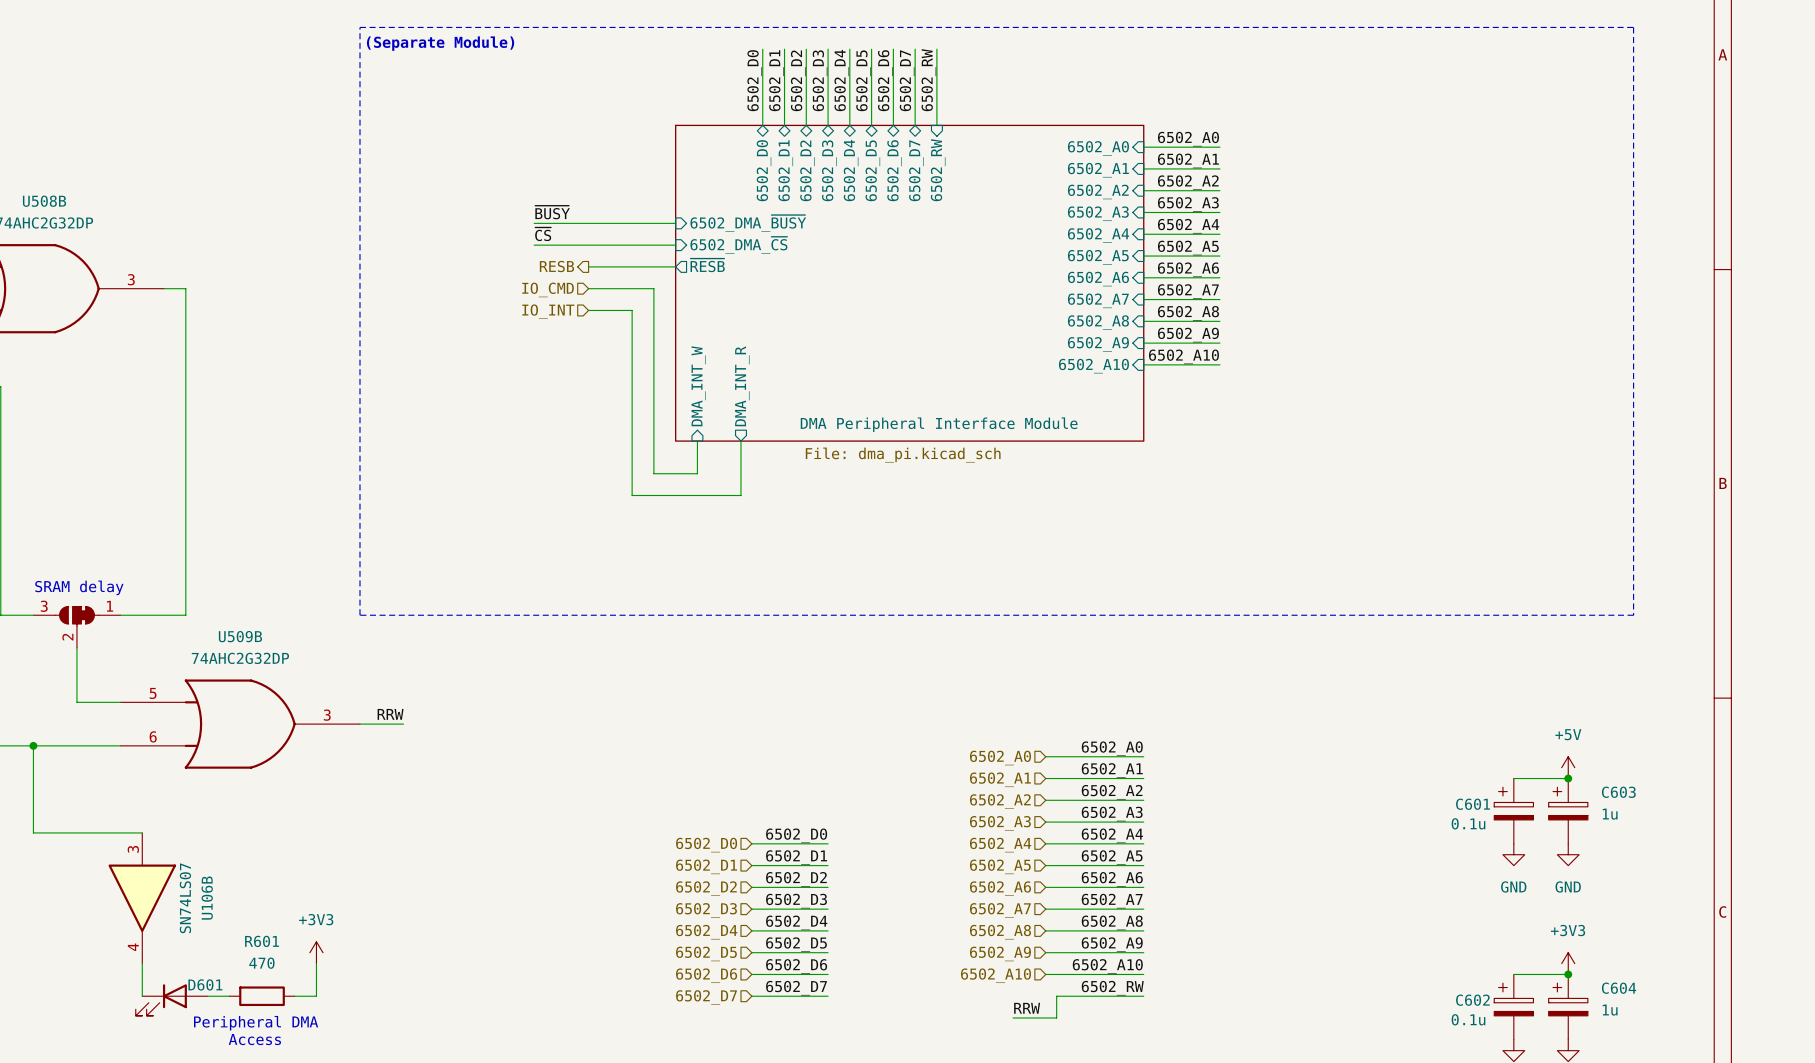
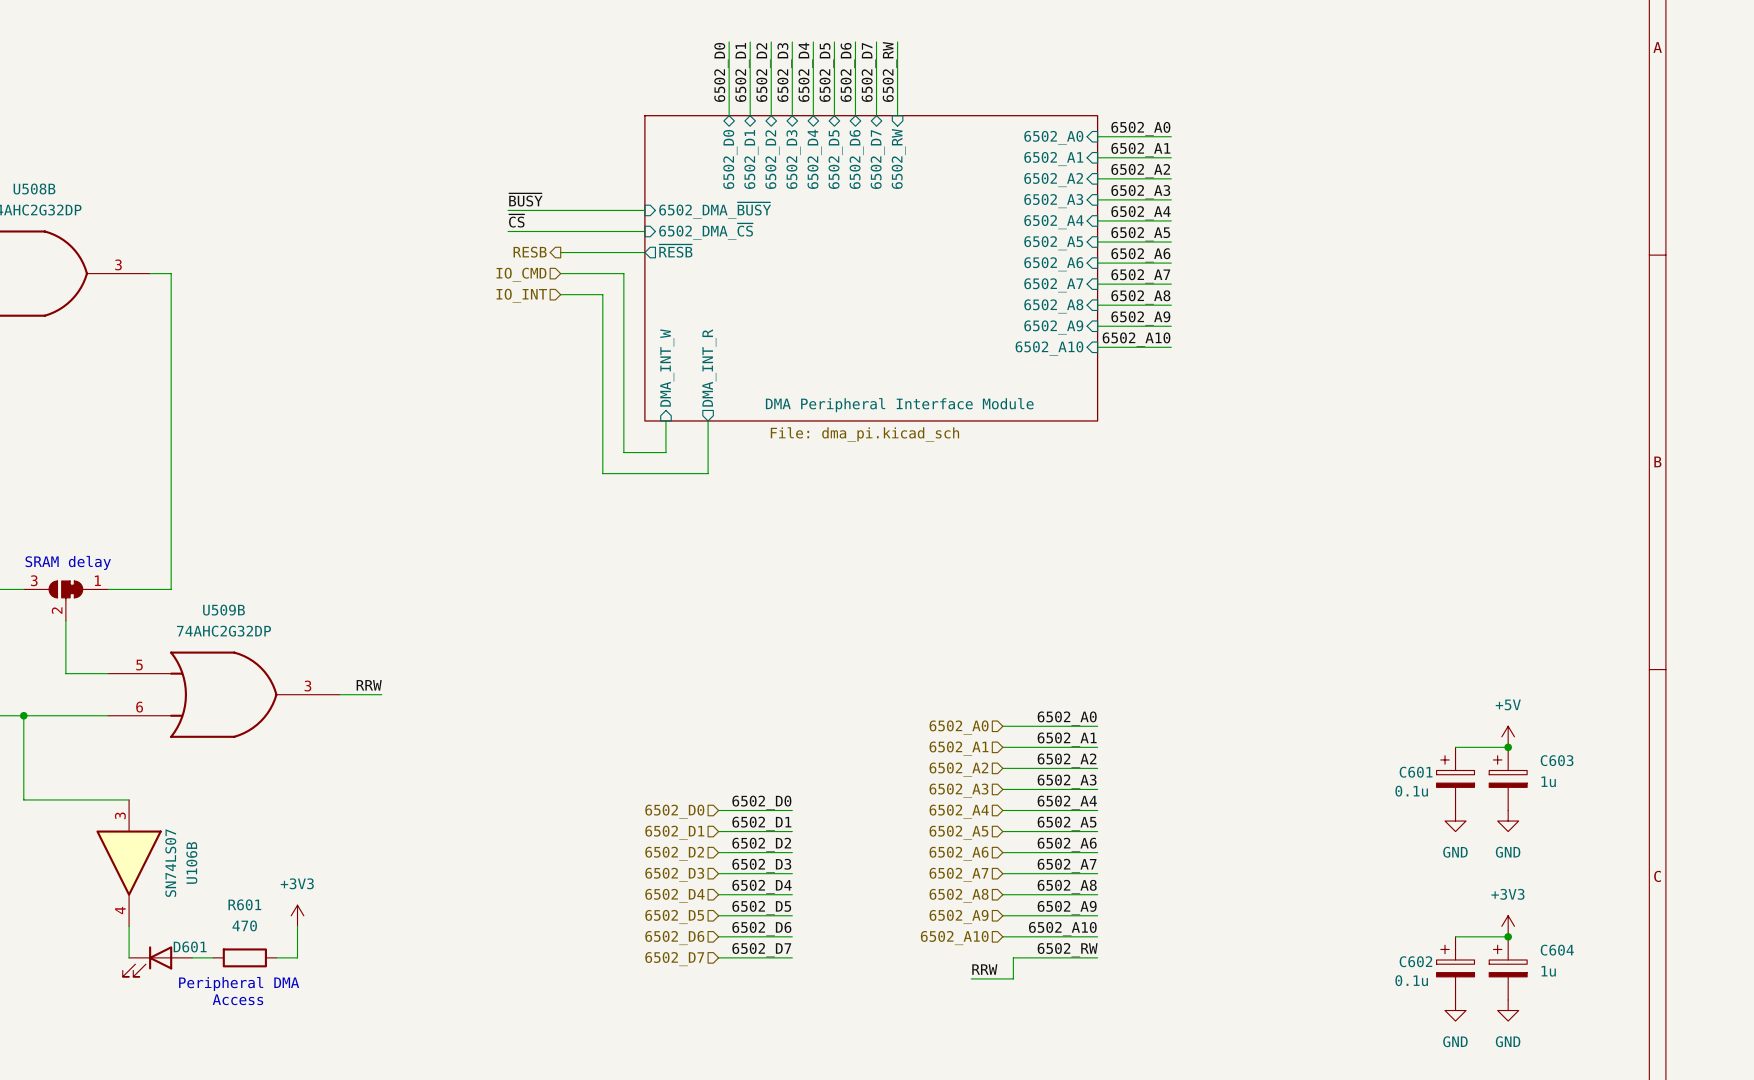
line: (359, 27) (1633, 27) (1633, 615) (359, 615) (359, 27) -> none
text: (Separate Module) (440, 43) -> none

